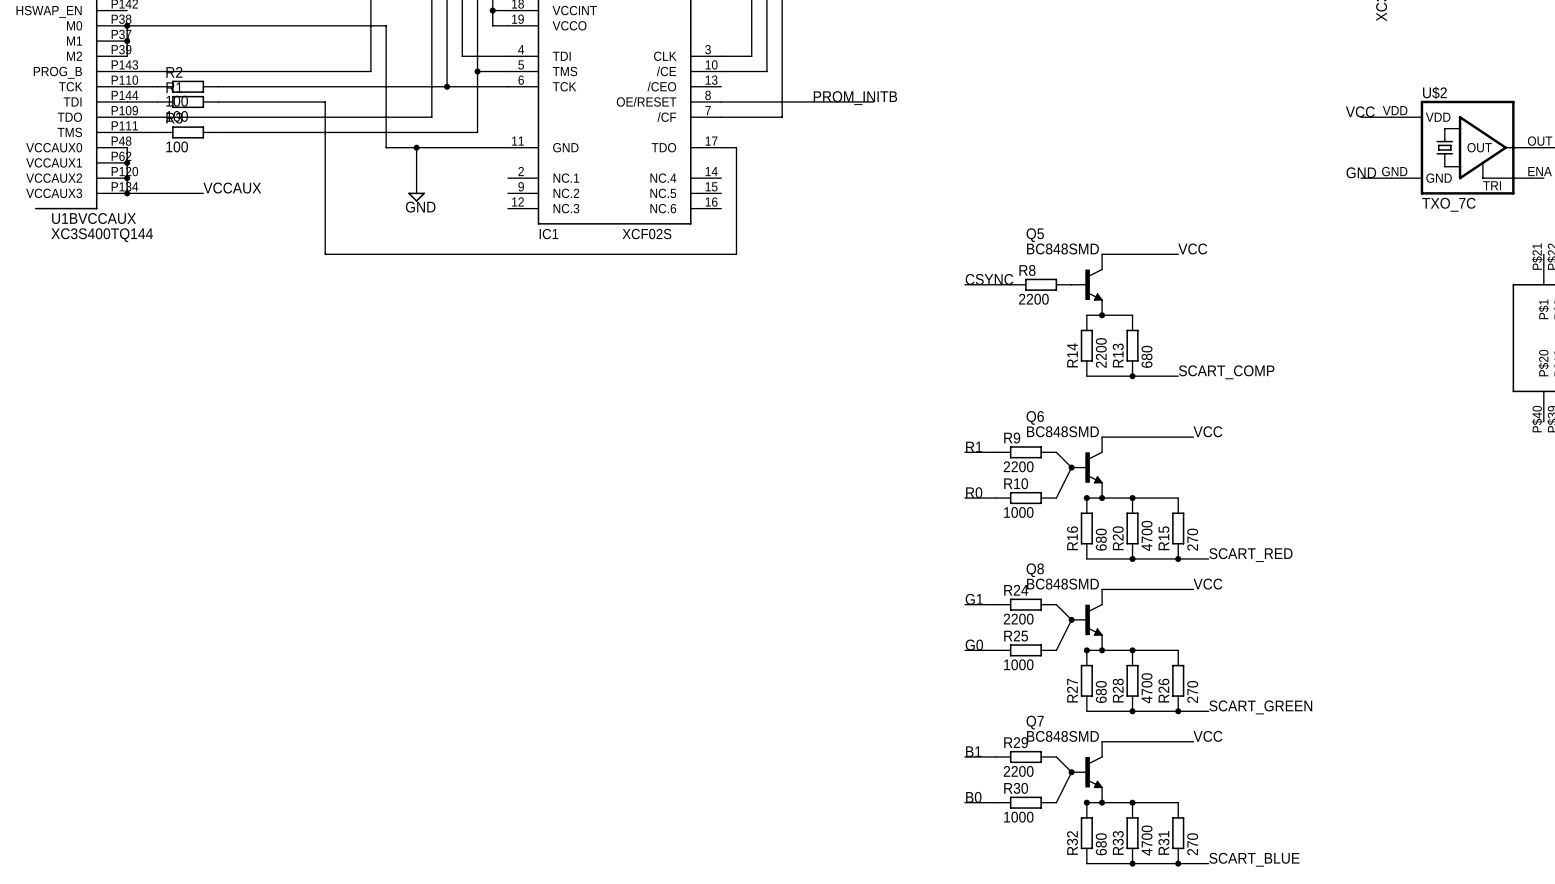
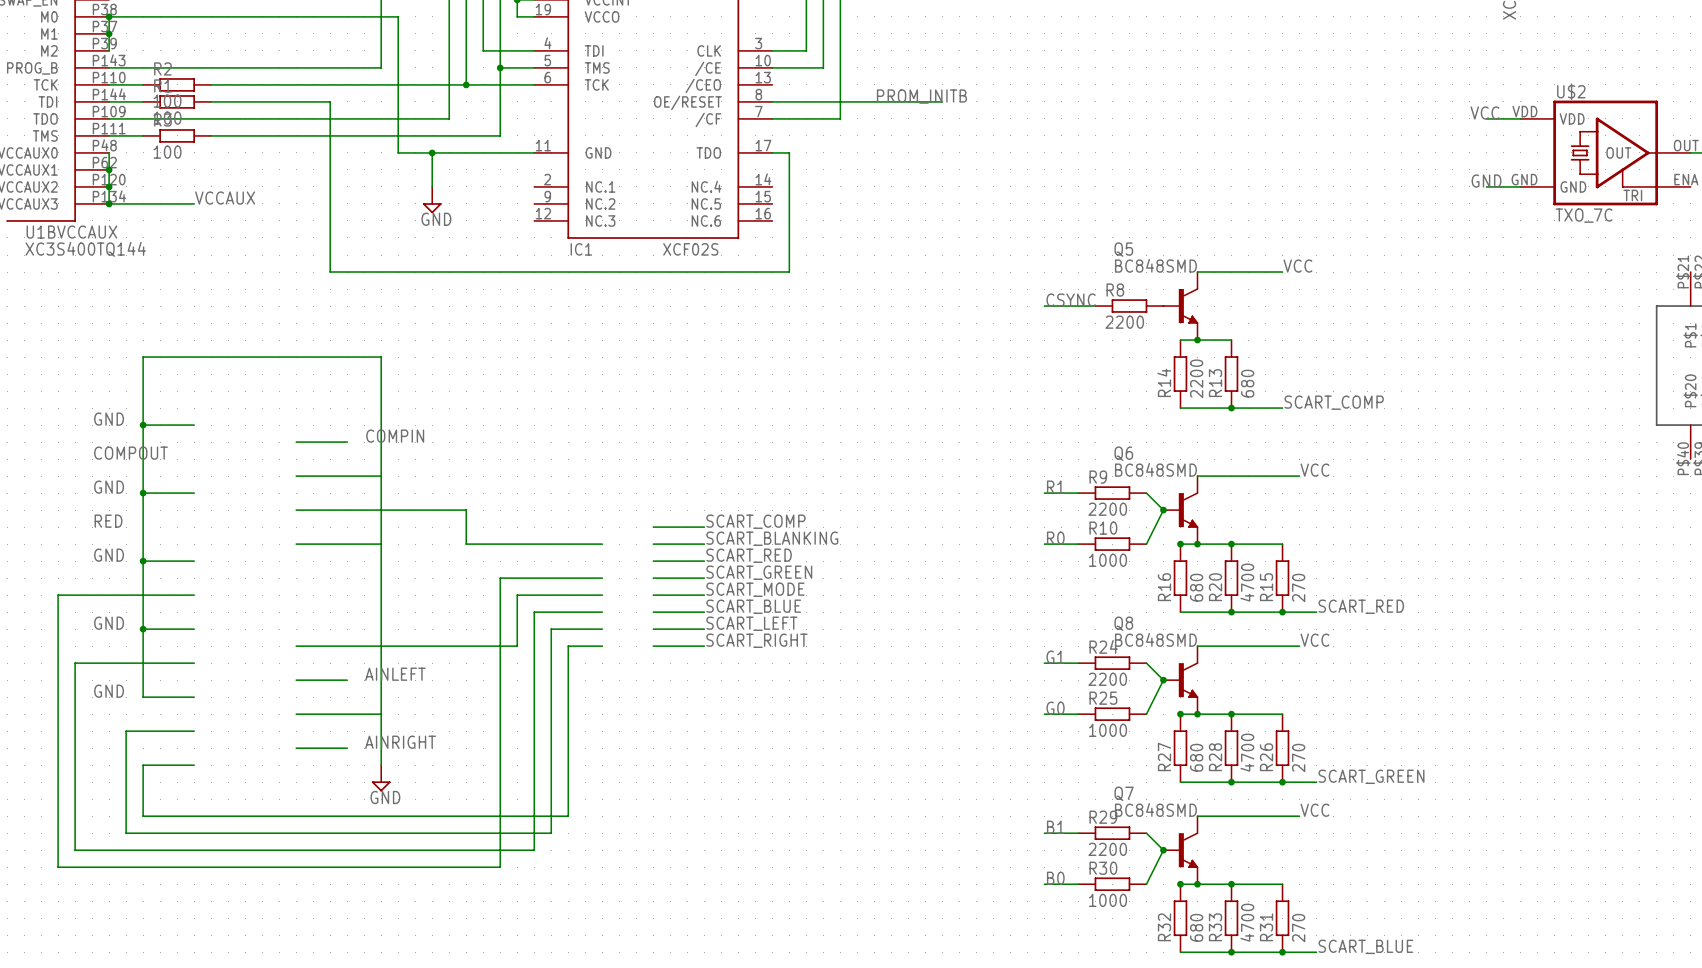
label: none -> GND (109, 419)
wire: none -> (143, 425) (194, 425)
junction: none -> (143, 425)
label: none -> COMPIN (395, 436)
wire: none -> (296, 442) (347, 442)
label: none -> COMPOUT (130, 453)
wire: none -> (296, 476) (381, 476)
label: none -> GND (109, 487)
wire: none -> (143, 493) (194, 493)
junction: none -> (143, 493)
wire: none -> (296, 510) (466, 510) (466, 544) (602, 544)
label: none -> RED (108, 521)
label: none -> SCART_COMP (755, 521)
wire: none -> (653, 527) (704, 527)
label: none -> SCART_BLANKING (772, 538)
wire: none -> (296, 544) (381, 544)
wire: none -> (653, 544) (704, 544)
label: none -> GND (109, 555)
label: none -> SCART_RED (749, 555)
wire: none -> (143, 561) (194, 561)
junction: none -> (143, 561)
wire: none -> (653, 561) (704, 561)
label: none -> SCART_GREEN (759, 572)
wire: none -> (602, 578) (500, 578) (500, 867) (58, 867) (58, 595) (194, 595)
wire: none -> (653, 578) (704, 578)
label: none -> SCART_MODE (755, 589)
wire: none -> (602, 595) (517, 595) (517, 646) (296, 646)
wire: none -> (653, 595) (704, 595)
label: none -> SCART_BLUE (753, 606)
wire: none -> (602, 612) (534, 612) (534, 850) (75, 850) (75, 663) (194, 663)
wire: none -> (653, 612) (704, 612)
label: none -> GND (109, 623)
label: none -> SCART_LEFT (751, 623)
wire: none -> (143, 629) (194, 629)
junction: none -> (143, 629)
wire: none -> (602, 629) (551, 629) (551, 833) (126, 833) (126, 731) (194, 731)
wire: none -> (653, 629) (704, 629)
label: none -> SCART_RIGHT (756, 640)
wire: none -> (602, 646) (568, 646) (568, 816) (143, 816) (143, 765) (194, 765)
wire: none -> (653, 646) (704, 646)
label: none -> AINLEFT (395, 674)
wire: none -> (296, 680) (347, 680)
label: none -> GND (109, 691)
wire: none -> (194, 697) (143, 697) (143, 357) (381, 357) (381, 765)
wire: none -> (296, 714) (381, 714)
label: none -> AINRIGHT (400, 742)
wire: none -> (296, 748) (347, 748)
power symbol: none -> GND (381, 778)

